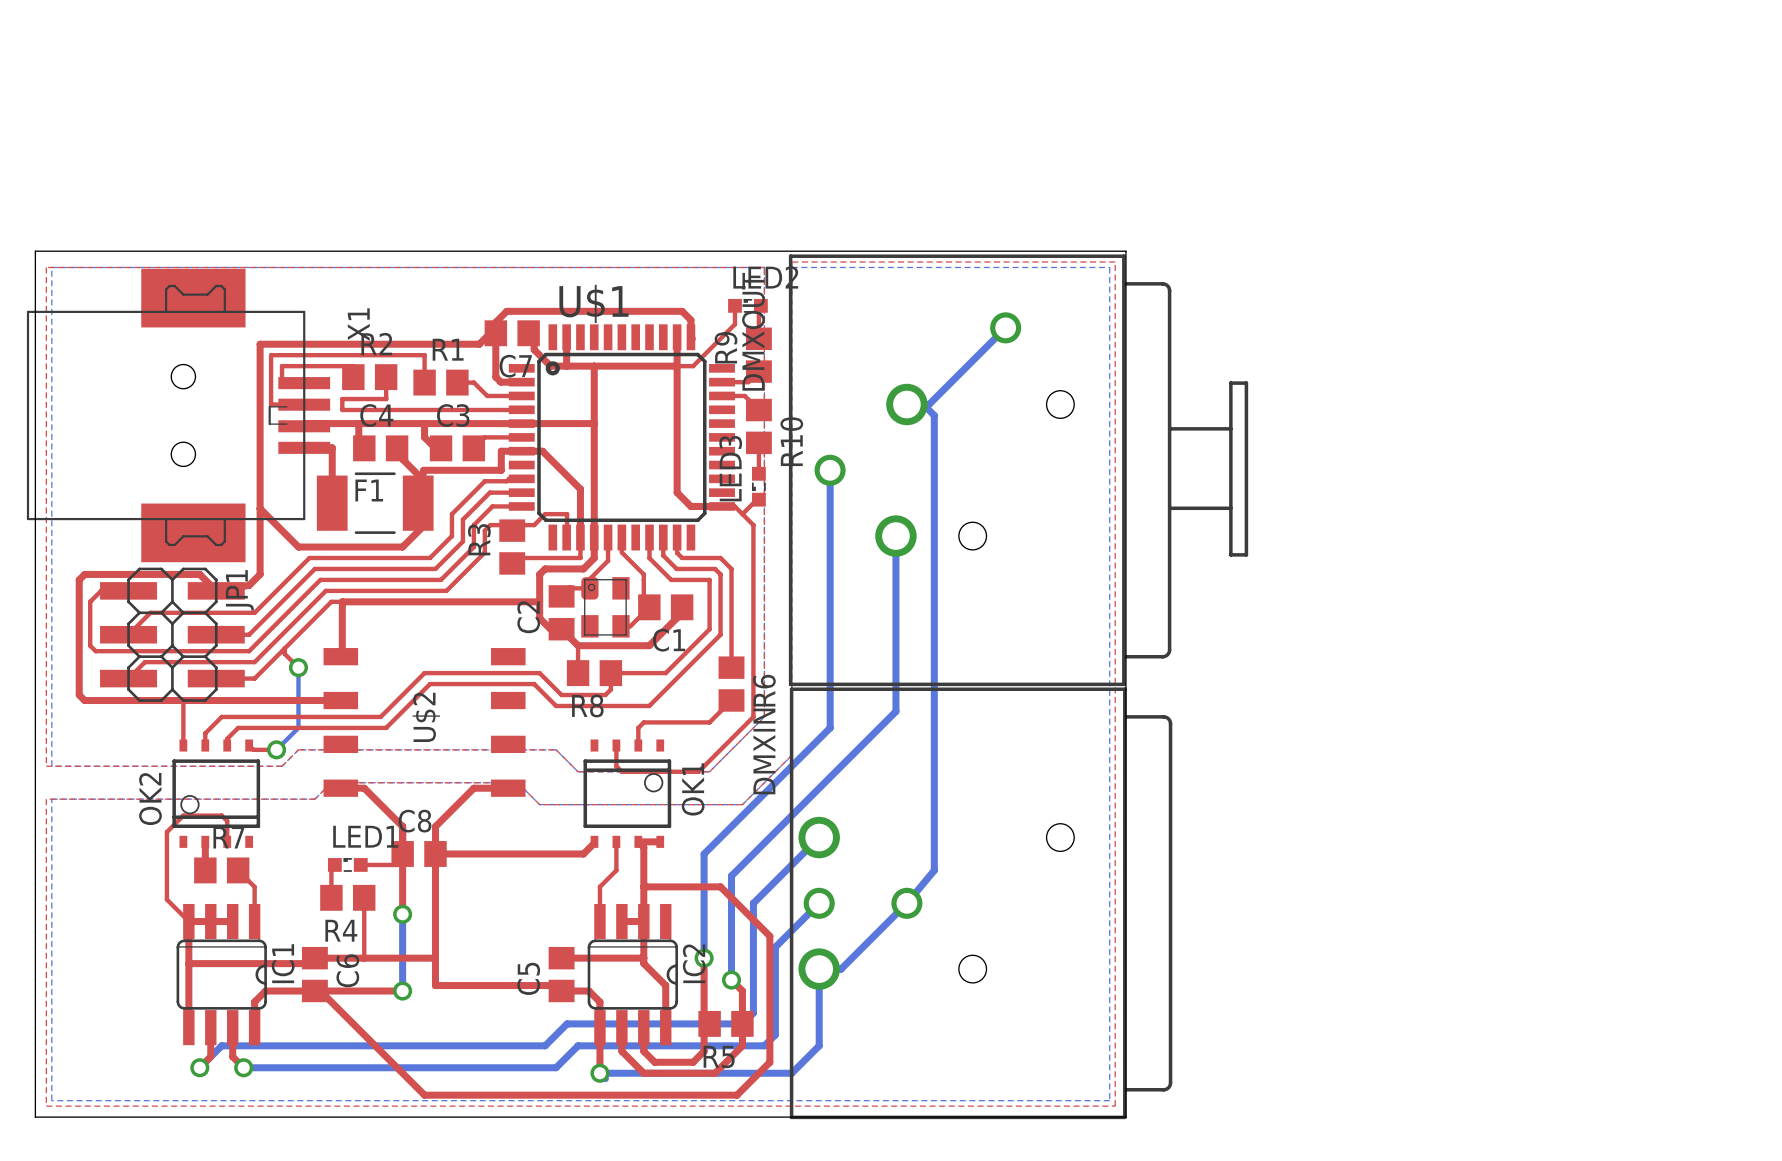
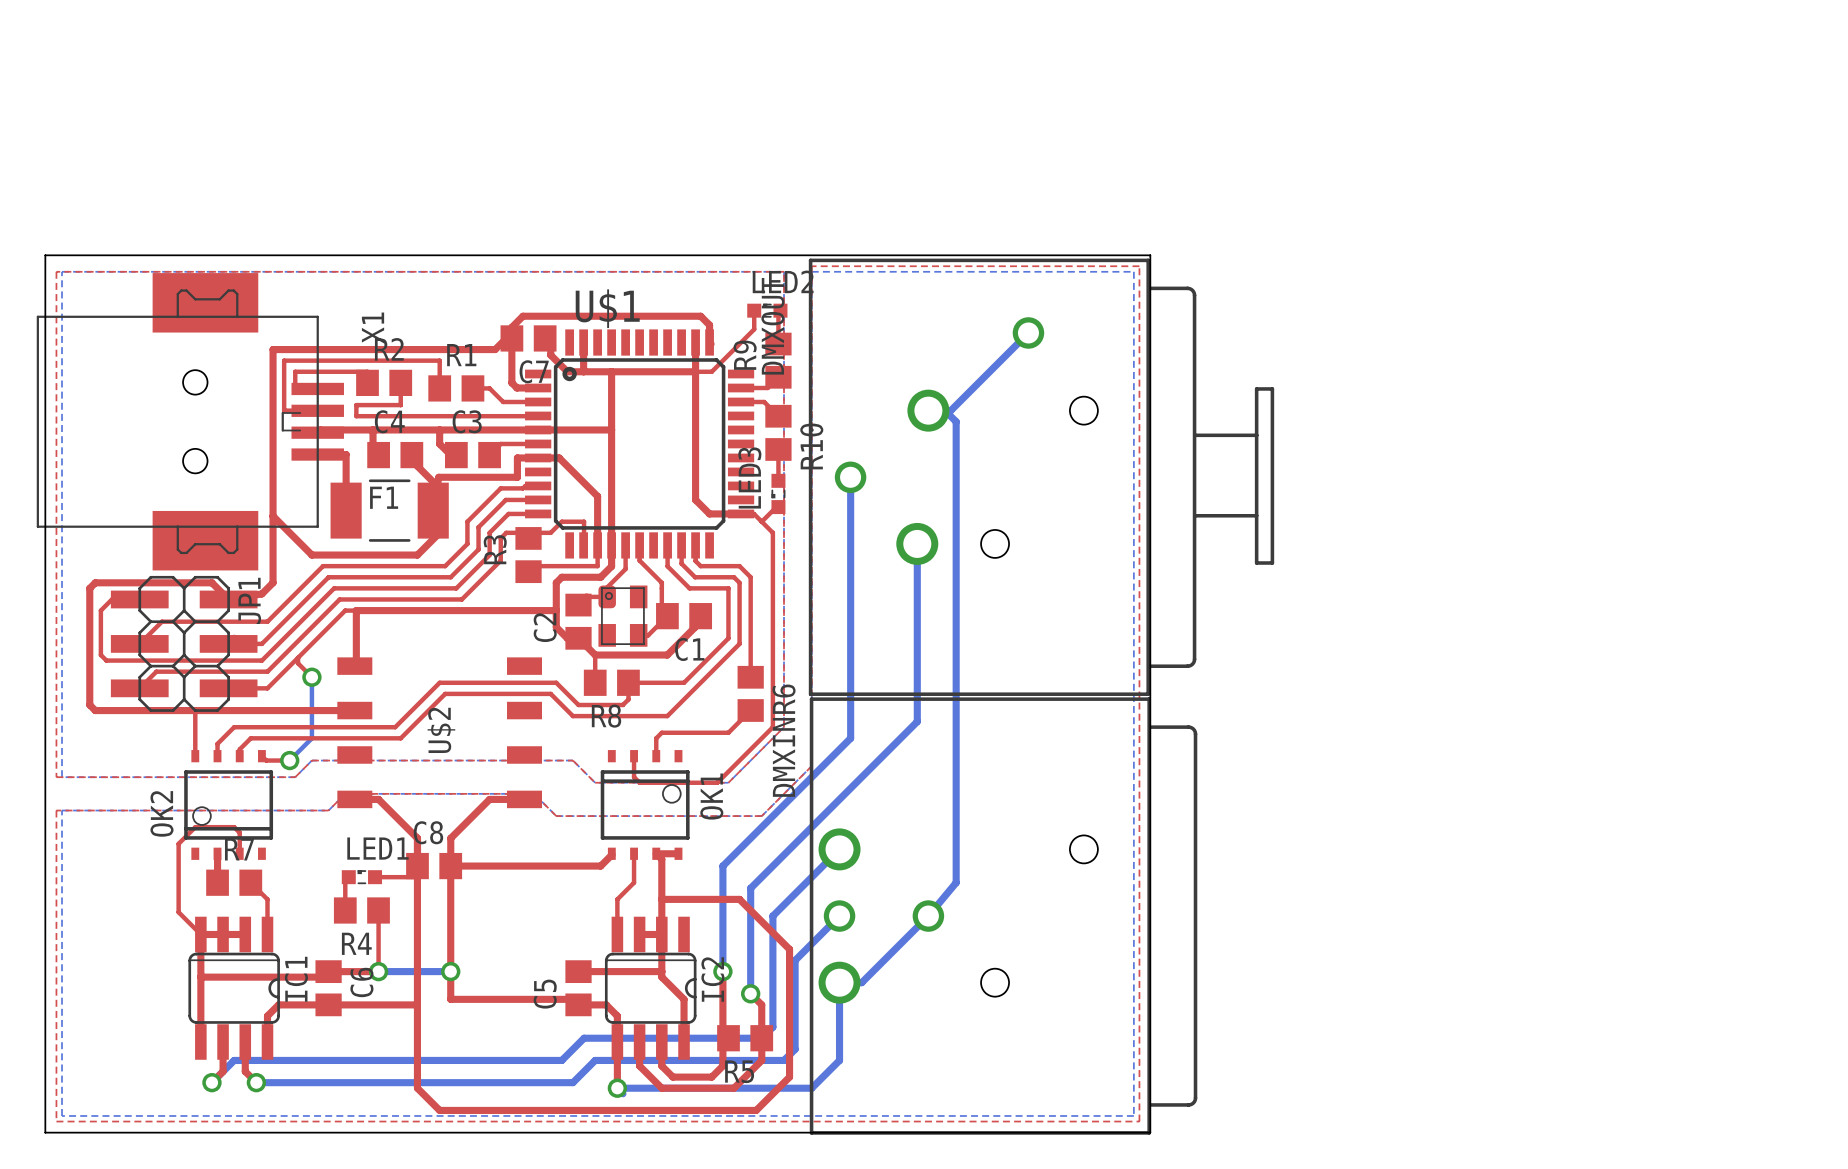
bottom track: (402, 914) (402, 991) -> none
via: (402, 914) -> none
top track: (364, 958) (435, 958) -> none
bottom track: none -> (378, 971) (450, 971)
via: none -> (378, 971)
via: none -> (450, 971)
top track: (320, 990) (402, 1073) -> (417, 927) (417, 1088)
via: (402, 991) -> none

